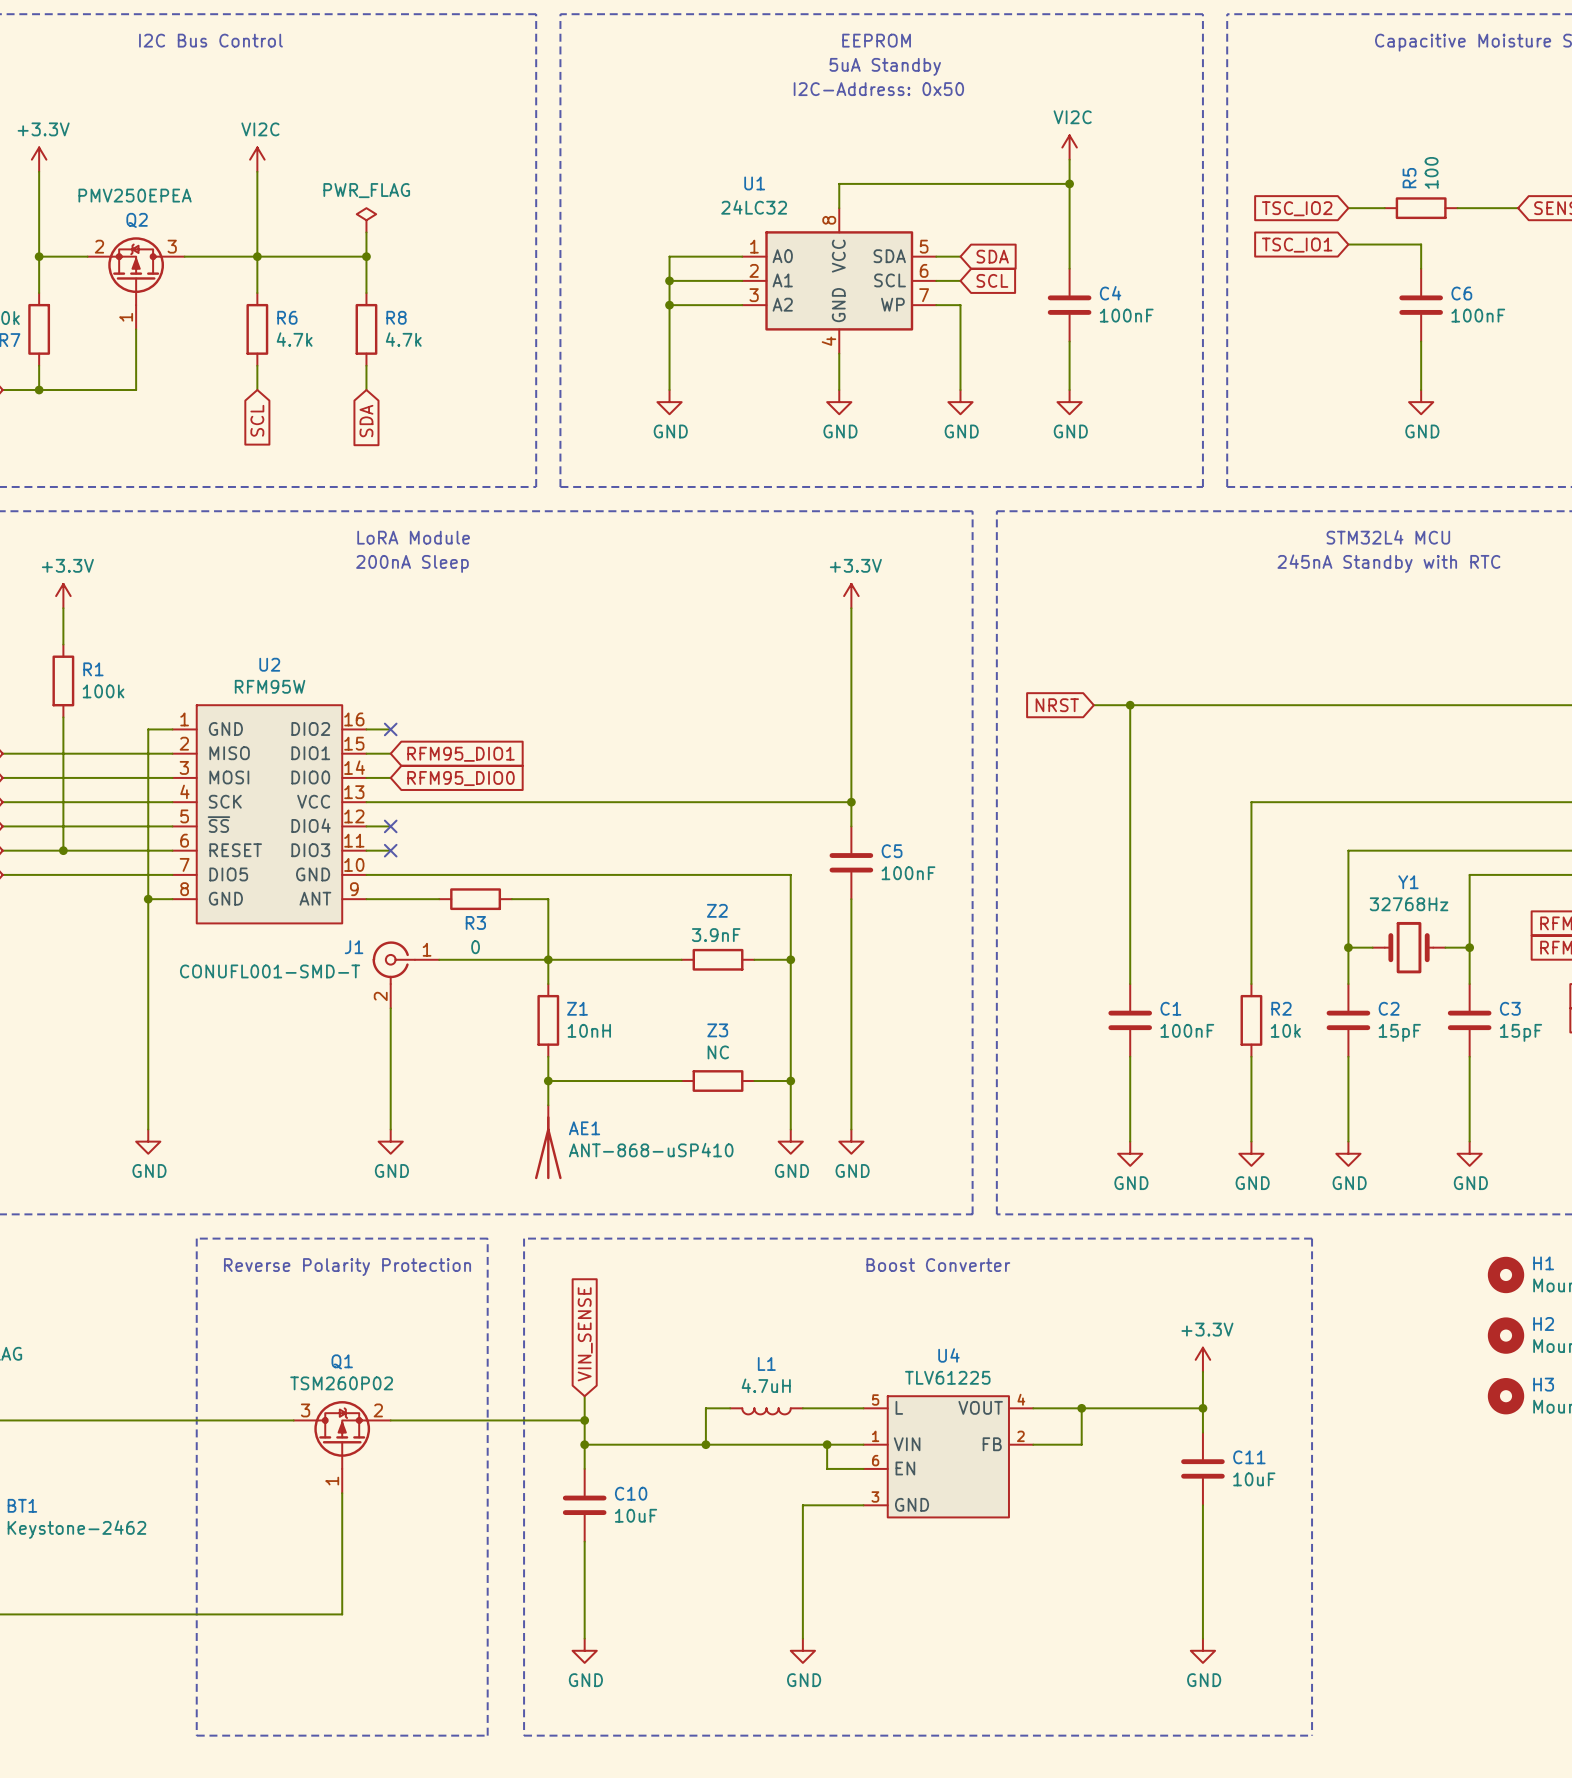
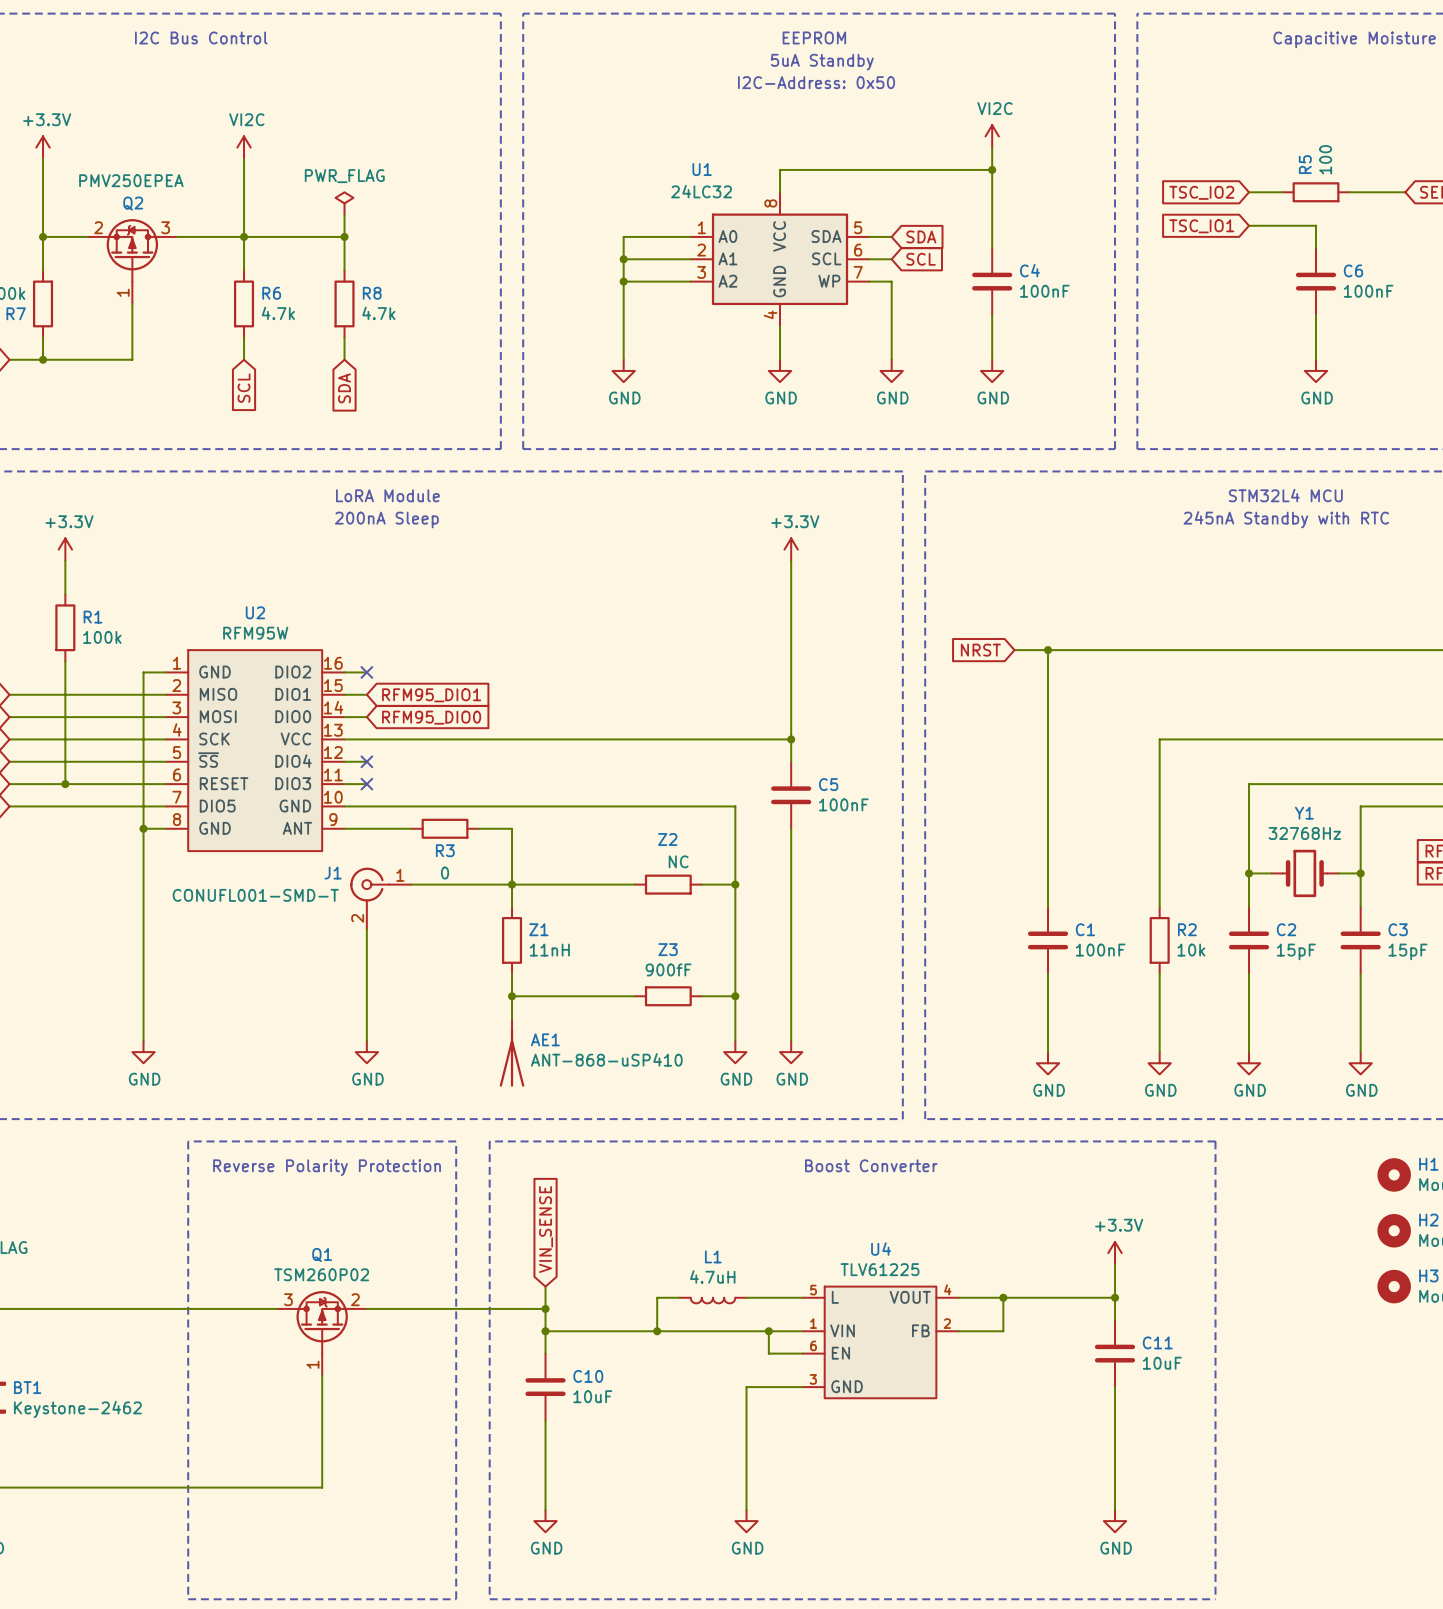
Z2 value: 3.9nF (716, 935) -> NC (678, 861)
Z1 value: 10nH (589, 1030) -> 11nH (549, 950)
Z3 value: NC (718, 1052) -> 900fF (668, 969)

